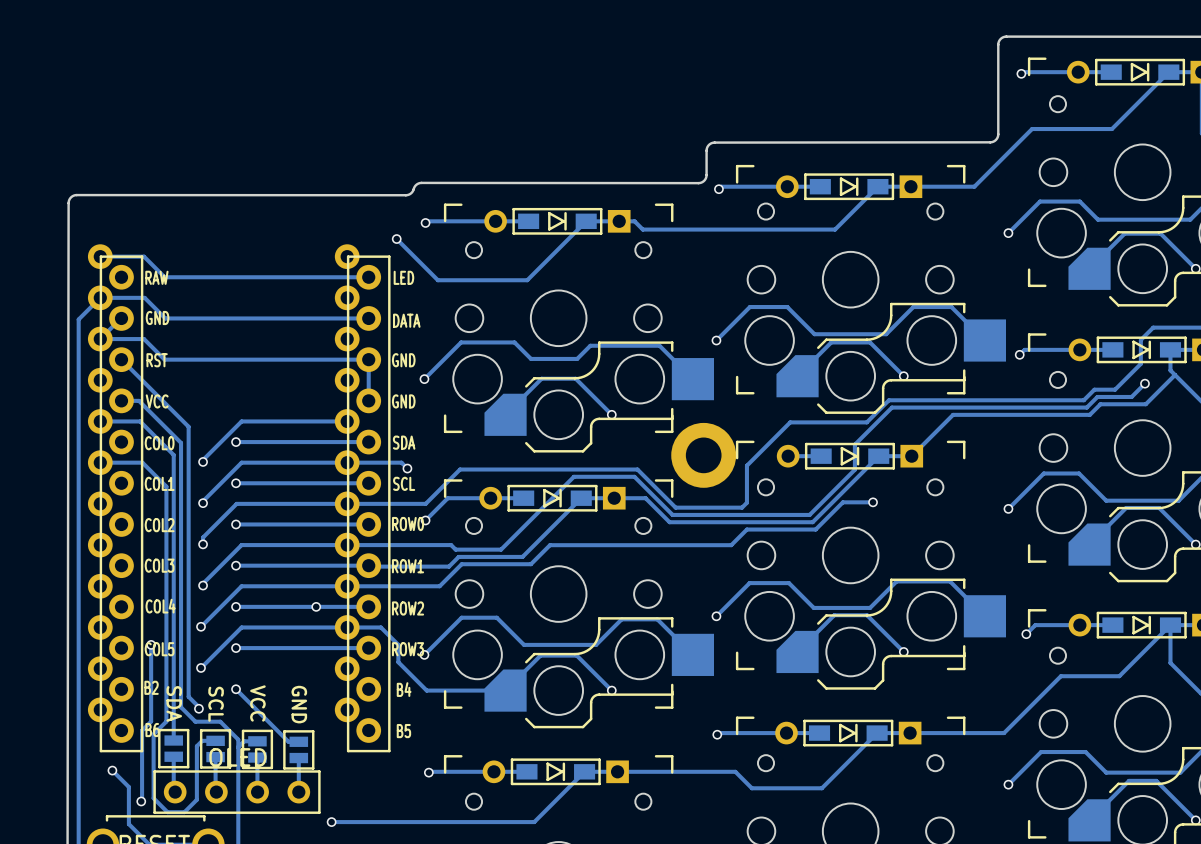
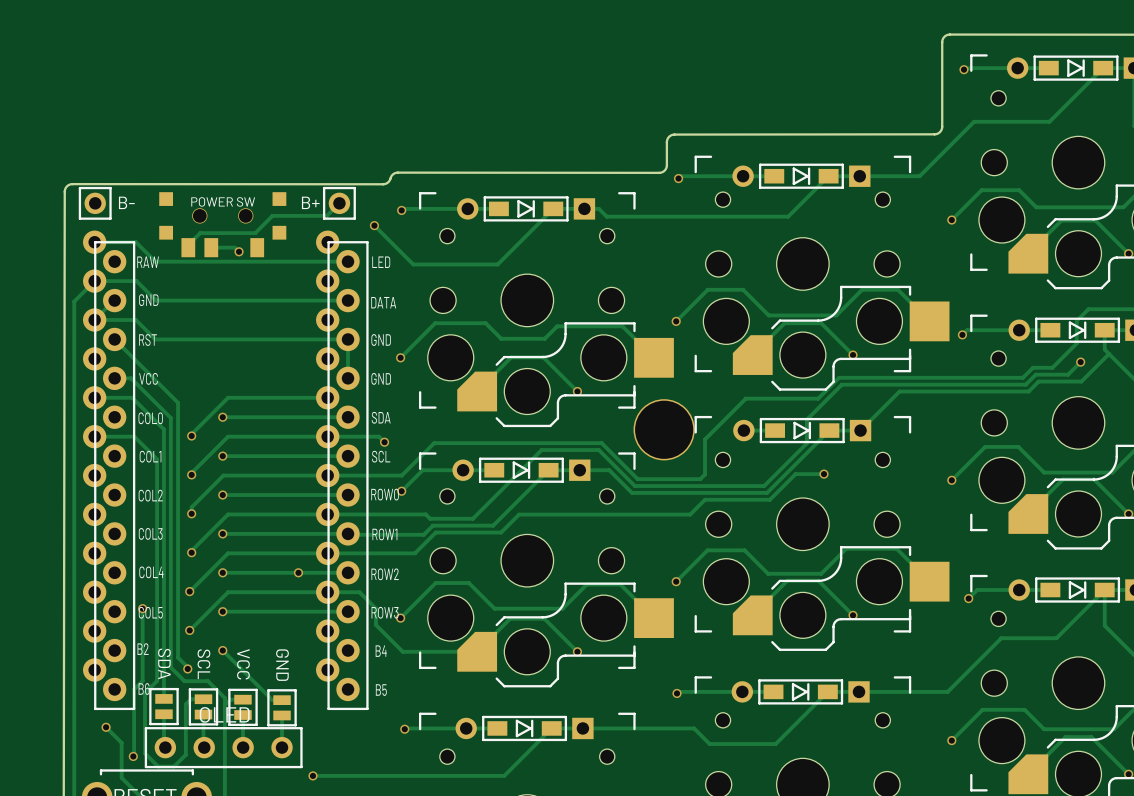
B-: none -> (95, 203)
track: none -> (339, 203) (326, 215) (272, 215) (255, 233) (200, 233) (188, 244) (188, 247)
B+: none -> (339, 203)
POWER SW: none -> (222, 224)
track: none -> (211, 247) (234, 247) (239, 251)
via: none -> (239, 251)
part footprint: [671, 422, 737, 488] -> [633, 399, 695, 461]

